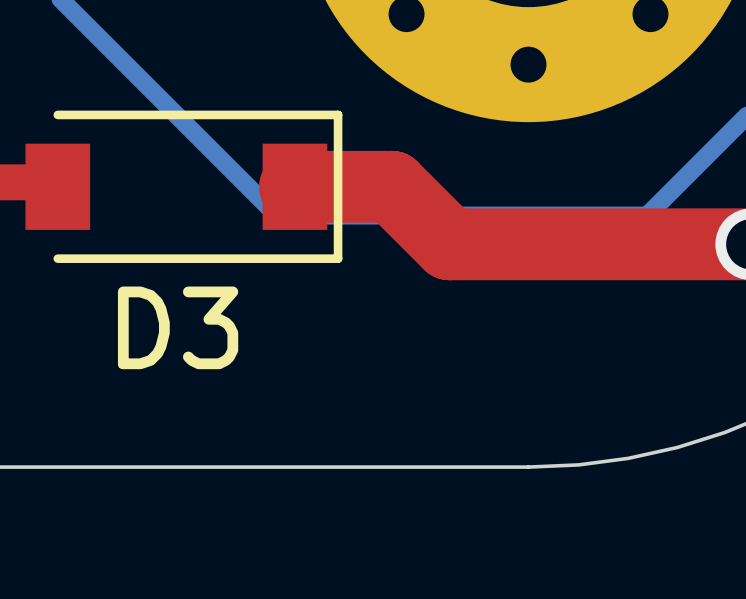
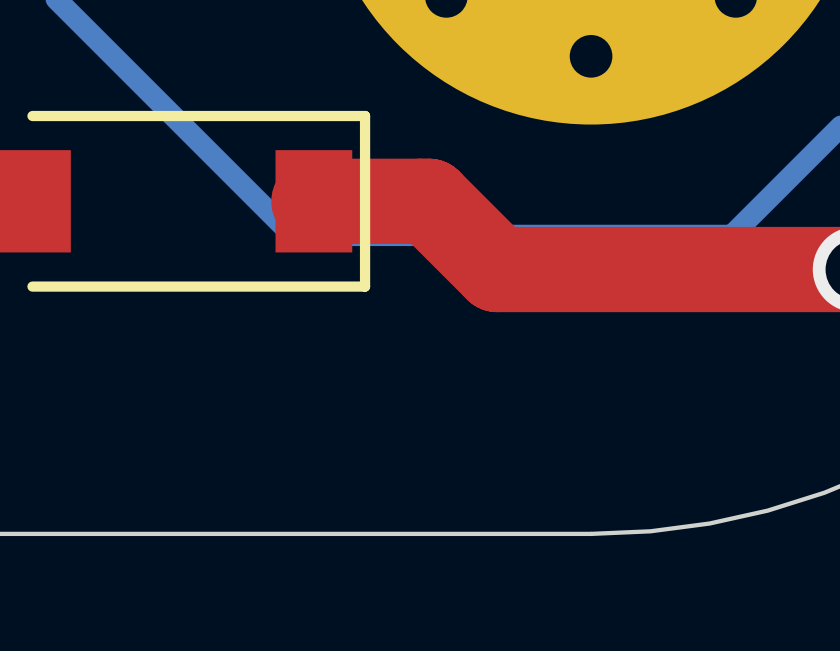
D3 name: D3 (178, 327) -> none

